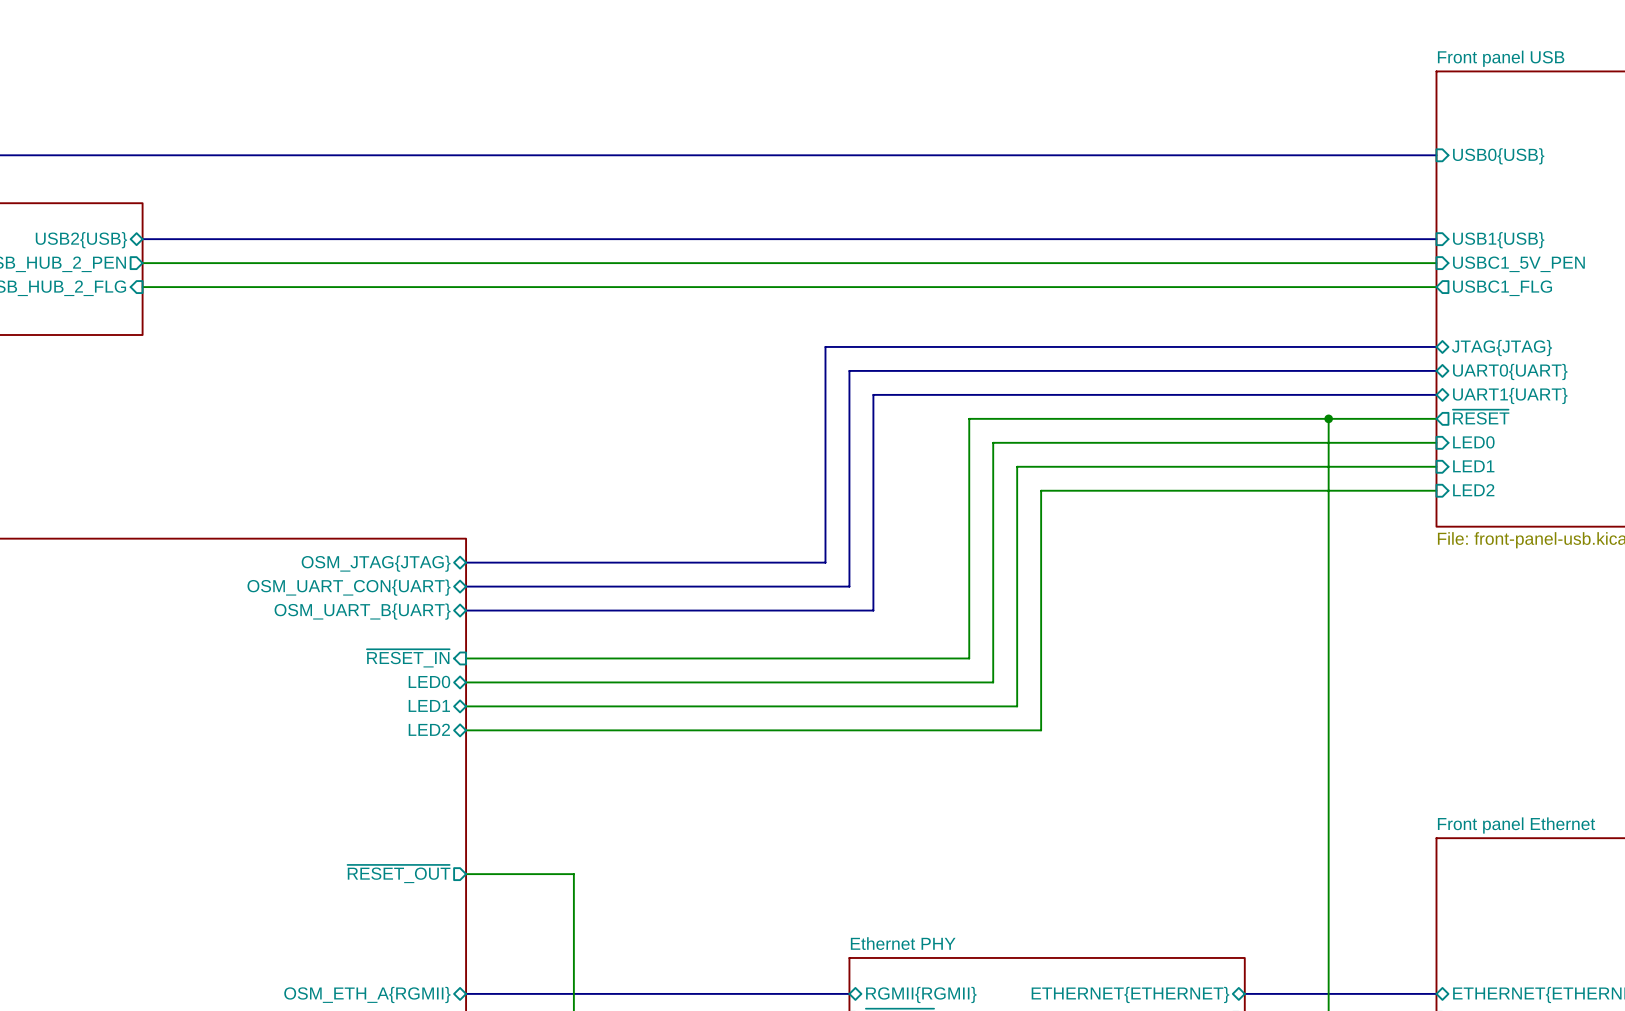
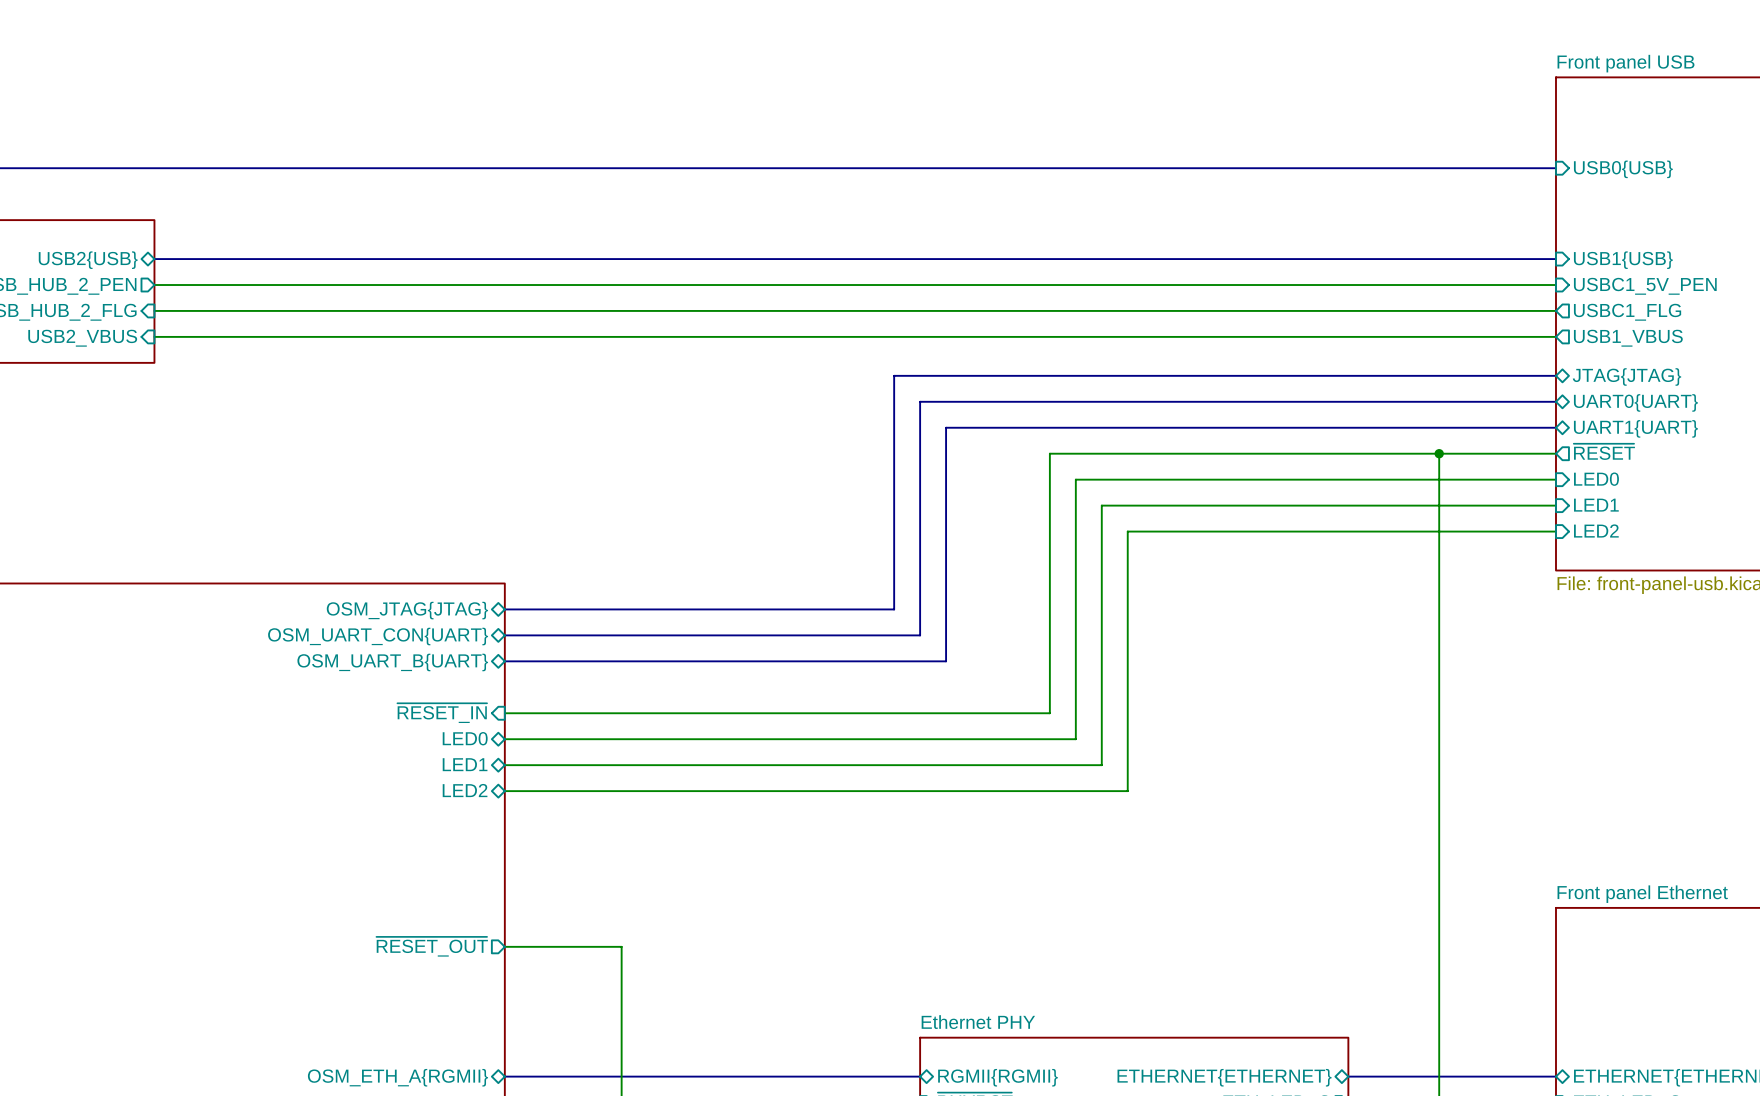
wire: none -> (154, 336) (1555, 336)
sheet pin: none -> USB2_VBUS (82, 338)
sheet pin: none -> USB1_VBUS (1628, 338)

